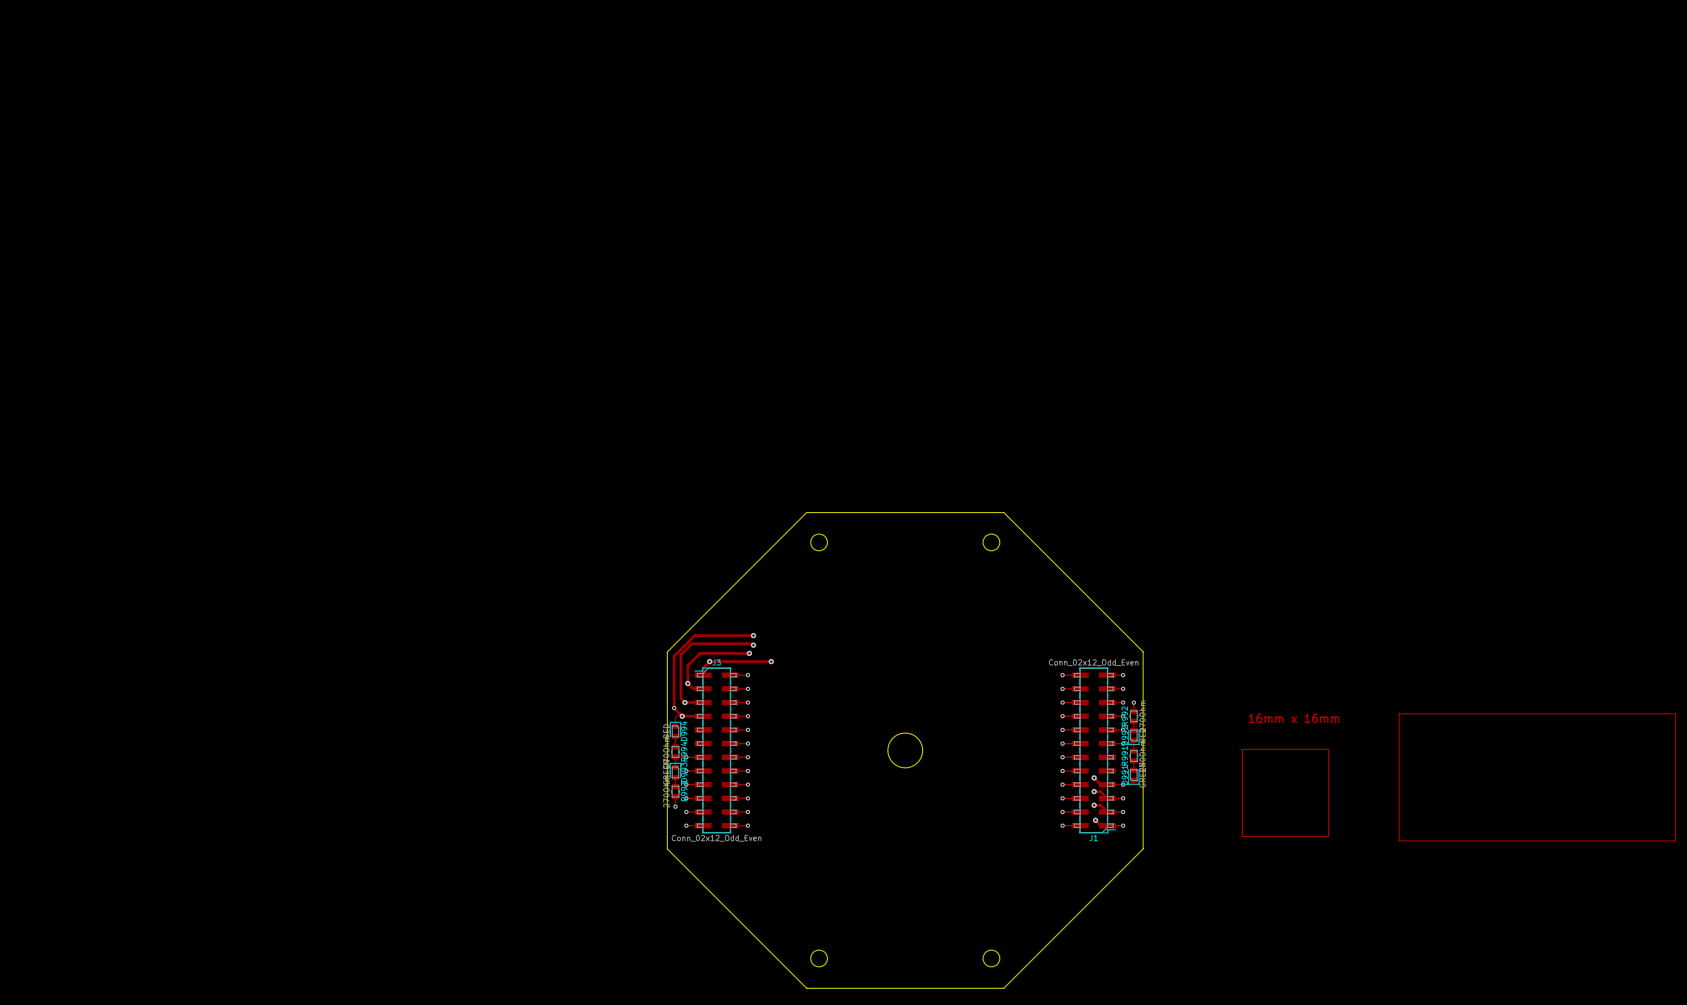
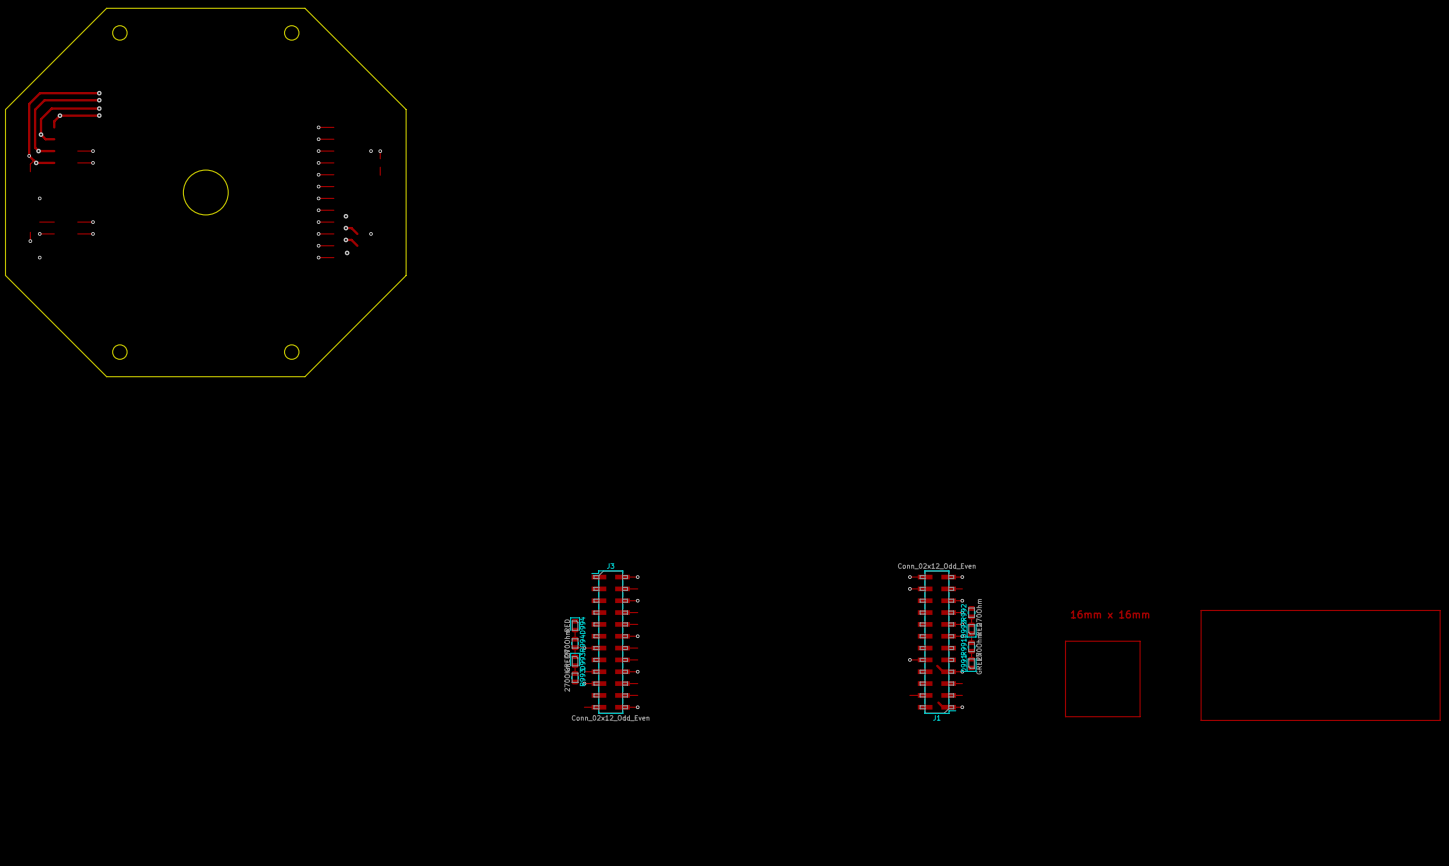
board edge: none -> (106, 8) (5, 109) (5, 275) (106, 376) (305, 376) (406, 275) (406, 109) (305, 8) (106, 8)
round board edge: none -> [112, 25, 128, 41]
round board edge: none -> [284, 25, 299, 41]
track: none -> (99, 93) (40, 93) (29, 104) (29, 155) (36, 162) (54, 162)
via: none -> (99, 93)
track: none -> (99, 100) (44, 100) (35, 109) (35, 147) (38, 151) (54, 151)
via: none -> (99, 100)
track: none -> (99, 108) (51, 108) (41, 119) (41, 134) (45, 139) (54, 139)
via: none -> (99, 108)
via: none -> (59, 115)
track: none -> (99, 115) (59, 115) (54, 121) (54, 127)
via: none -> (99, 115)
track: none -> (318, 127) (333, 127)
via: none -> (318, 127)
via: none -> (41, 134)
track: none -> (318, 139) (333, 139)
via: none -> (318, 139)
via: none -> (38, 151)
track: none -> (77, 151) (93, 151)
via: none -> (93, 151)
track: none -> (318, 151) (333, 151)
via: none -> (318, 151)
via: none -> (371, 151)
track: none -> (380, 151) (380, 158)
via: none -> (380, 151)
via: none -> (29, 155)
track: none -> (33, 160) (30, 164) (30, 171)
via: none -> (36, 162)
track: none -> (77, 162) (93, 162)
via: none -> (93, 162)
track: none -> (318, 162) (333, 162)
via: none -> (318, 162)
track: none -> (380, 167) (380, 175)
round board edge: none -> [183, 170, 229, 215]
track: none -> (318, 174) (333, 174)
via: none -> (318, 174)
track: none -> (318, 186) (333, 186)
via: none -> (318, 186)
via: none -> (39, 198)
track: none -> (318, 198) (333, 198)
via: none -> (318, 198)
track: none -> (318, 210) (333, 210)
via: none -> (318, 210)
via: none -> (345, 216)
track: none -> (39, 222) (54, 222)
track: none -> (77, 222) (93, 222)
via: none -> (93, 222)
track: none -> (318, 222) (333, 222)
via: none -> (318, 222)
track: none -> (345, 228) (351, 228) (357, 233)
via: none -> (345, 228)
track: none -> (30, 232) (30, 241)
track: none -> (39, 233) (54, 233)
via: none -> (39, 233)
track: none -> (77, 233) (93, 233)
via: none -> (93, 233)
track: none -> (318, 233) (333, 233)
via: none -> (318, 233)
via: none -> (371, 233)
track: none -> (345, 239) (351, 239) (357, 245)
via: none -> (345, 239)
via: none -> (30, 241)
track: none -> (318, 245) (333, 245)
via: none -> (318, 245)
via: none -> (347, 252)
via: none -> (39, 257)
track: none -> (318, 257) (333, 257)
via: none -> (318, 257)
round board edge: none -> [112, 344, 128, 360]
round board edge: none -> [284, 344, 299, 360]
board edge: (806, 512) (1003, 512) (1143, 651) (1143, 848) (1003, 988) (806, 988) (667, 848) (667, 651) (806, 512) -> none
round board edge: [810, 534, 828, 551] -> none
round board edge: [983, 534, 1000, 551] -> none
track: (753, 635) (694, 635) (674, 656) (674, 708) (682, 716) (703, 716) -> none
via: (753, 635) -> none
track: (753, 645) (691, 643) (680, 654) (680, 698) (684, 702) (703, 702) -> none
via: (753, 645) -> none
track: (749, 653) (700, 653) (687, 665) (687, 683) (693, 688) (703, 688) -> none
via: (749, 653) -> none
via: (709, 661) -> none
track: (771, 661) (709, 661) (703, 668) (703, 675) -> none
via: (771, 661) -> none
via: (687, 683) -> none
via: (747, 688) -> none
via: (1123, 688) -> none
via: (684, 702) -> none
track: (1062, 702) (1080, 702) -> none
via: (1062, 702) -> none
track: (1133, 702) (1133, 711) -> none
via: (1133, 702) -> none
via: (674, 708) -> none
track: (679, 713) (675, 717) (675, 726) -> none
via: (682, 716) -> none
via: (747, 716) -> none
track: (1062, 716) (1080, 716) -> none
via: (1062, 716) -> none
via: (747, 729) -> none
track: (1062, 729) (1080, 729) -> none
via: (1062, 729) -> none
round board edge: [887, 733, 923, 768] -> none
track: (1062, 743) (1080, 743) -> none
via: (1062, 743) -> none
via: (747, 757) -> none
track: (1062, 757) (1080, 757) -> none
via: (1062, 757) -> none
track: (686, 770) (703, 770) -> none
via: (686, 770) -> none
via: (747, 770) -> none
via: (1094, 777) -> none
via: (686, 784) -> none
track: (1062, 784) (1080, 784) -> none
via: (1062, 784) -> none
track: (1094, 791) (1100, 791) (1107, 798) -> none
via: (1094, 791) -> none
track: (675, 796) (675, 806) -> none
via: (747, 798) -> none
track: (1062, 798) (1080, 798) -> none
via: (1062, 798) -> none
via: (1123, 798) -> none
track: (1094, 805) (1100, 805) (1107, 812) -> none
via: (1094, 805) -> none
via: (675, 806) -> none
track: (686, 812) (703, 812) -> none
via: (686, 812) -> none
via: (747, 812) -> none
via: (1062, 812) -> none
via: (1123, 812) -> none
via: (1095, 820) -> none
via: (686, 825) -> none
track: (1062, 825) (1080, 825) -> none
via: (1062, 825) -> none
round board edge: [810, 950, 828, 967] -> none
round board edge: [983, 950, 1000, 967] -> none

